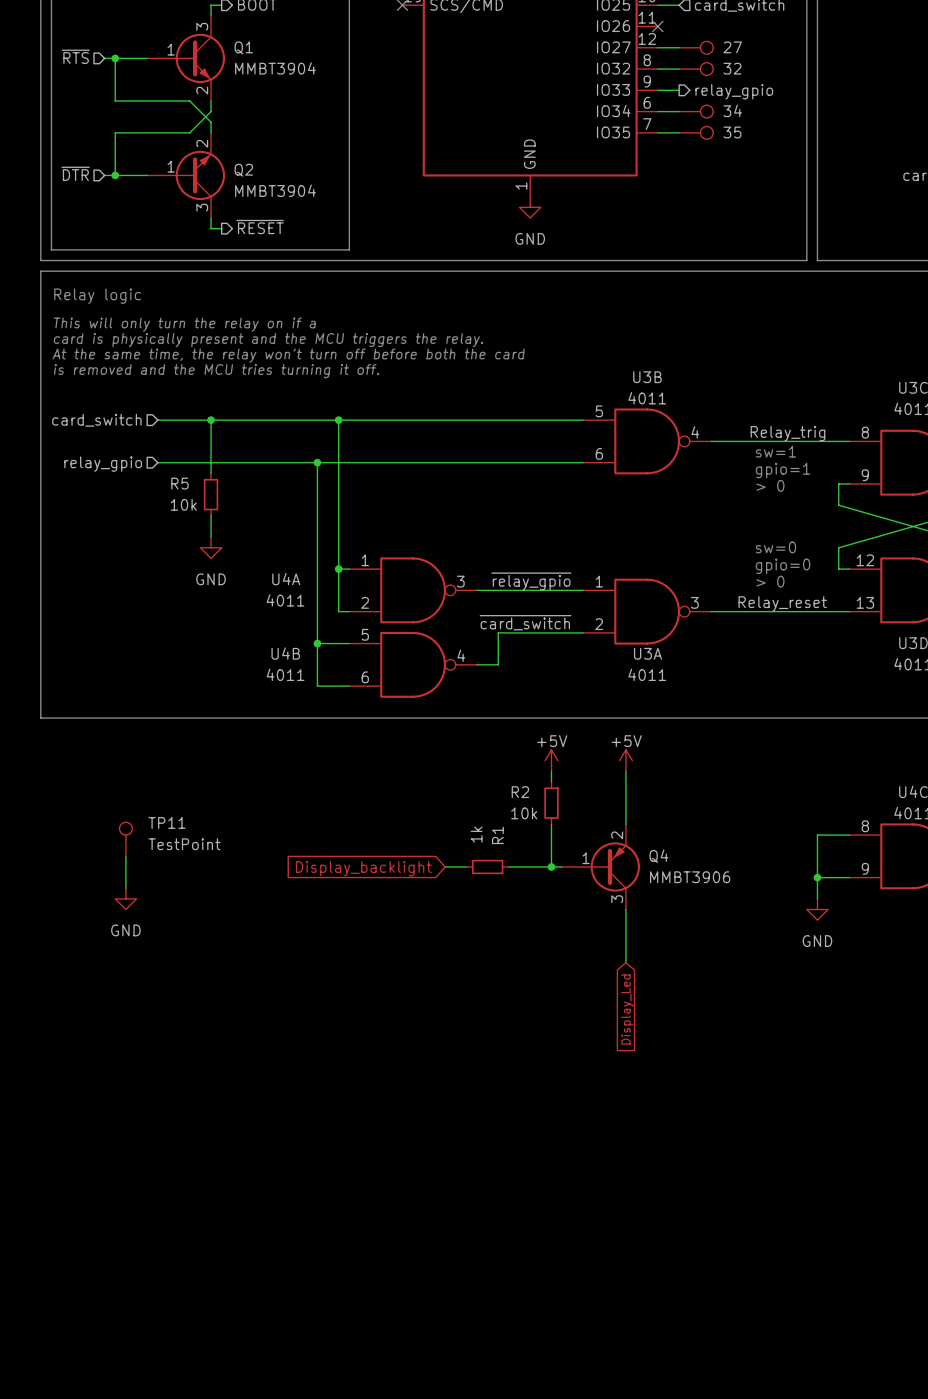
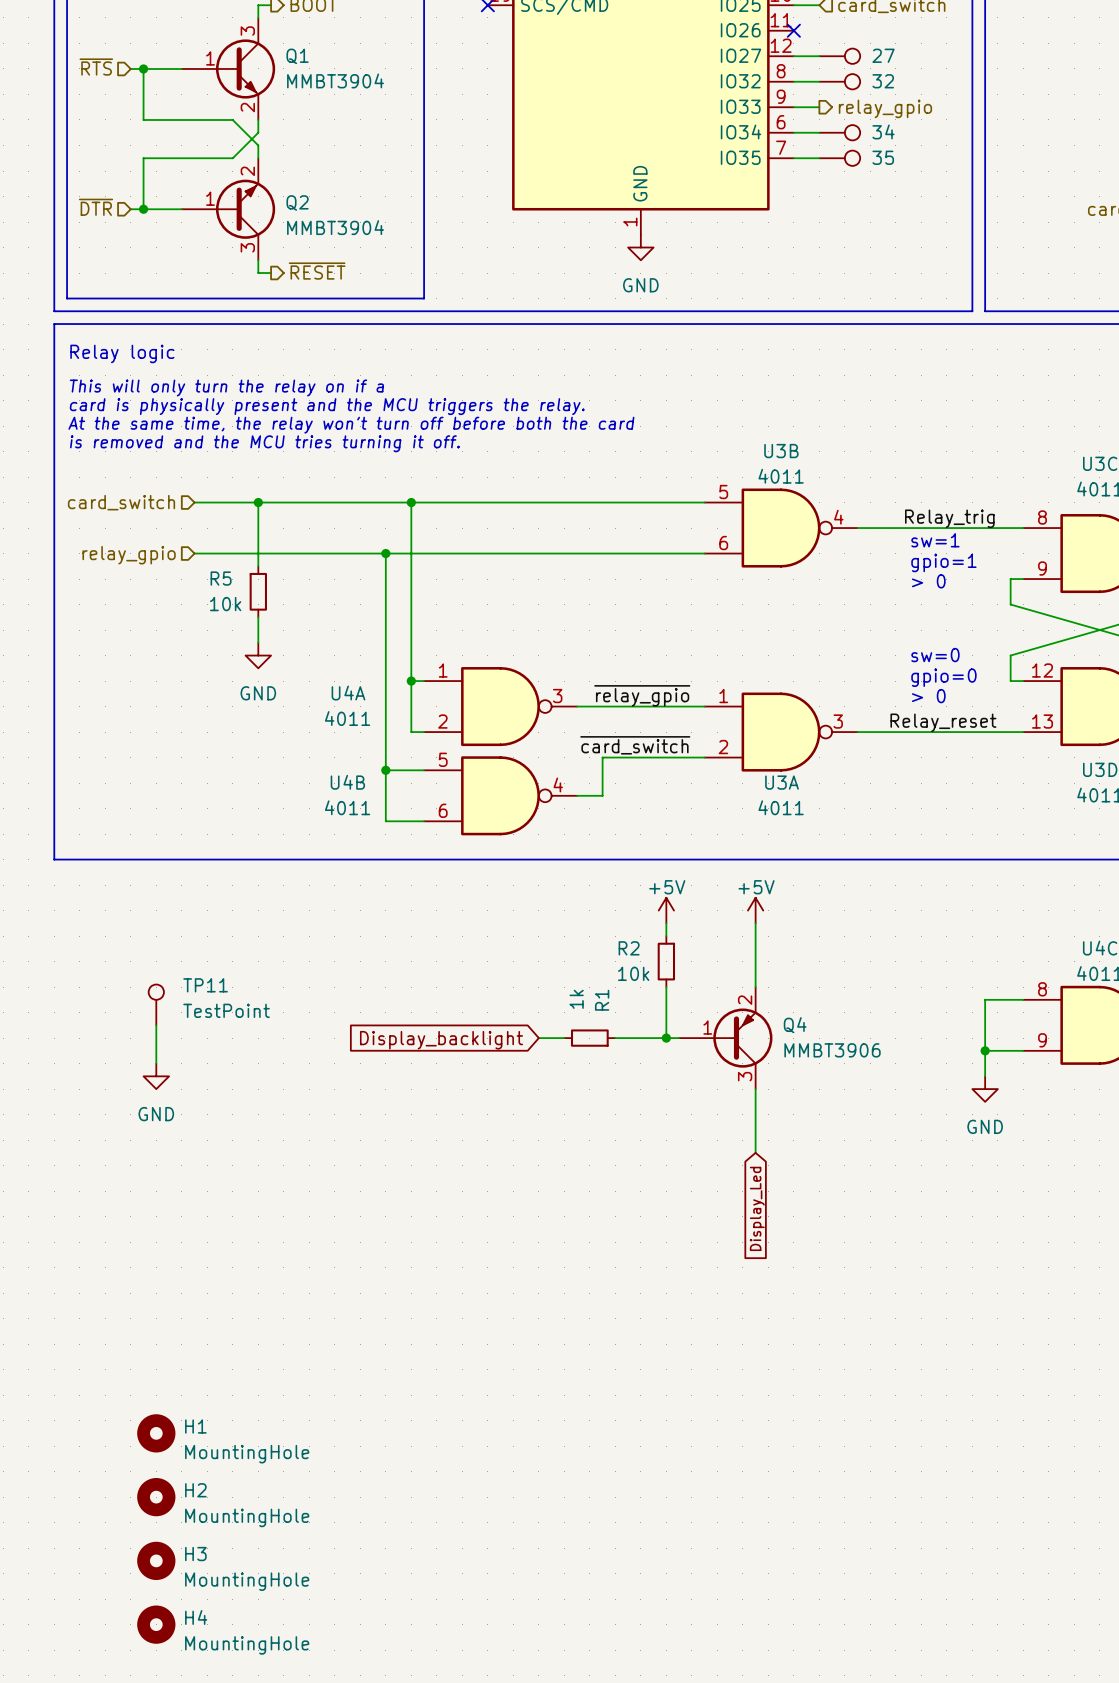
H1: none -> MountingHole (156, 1433)
H2: none -> MountingHole (156, 1497)
H3: none -> MountingHole (156, 1560)
H4: none -> MountingHole (156, 1624)

